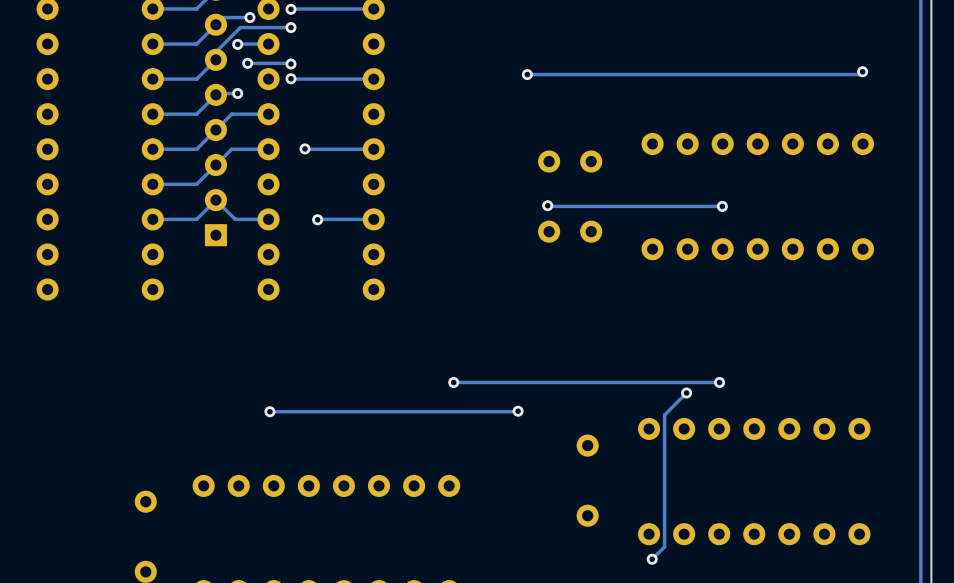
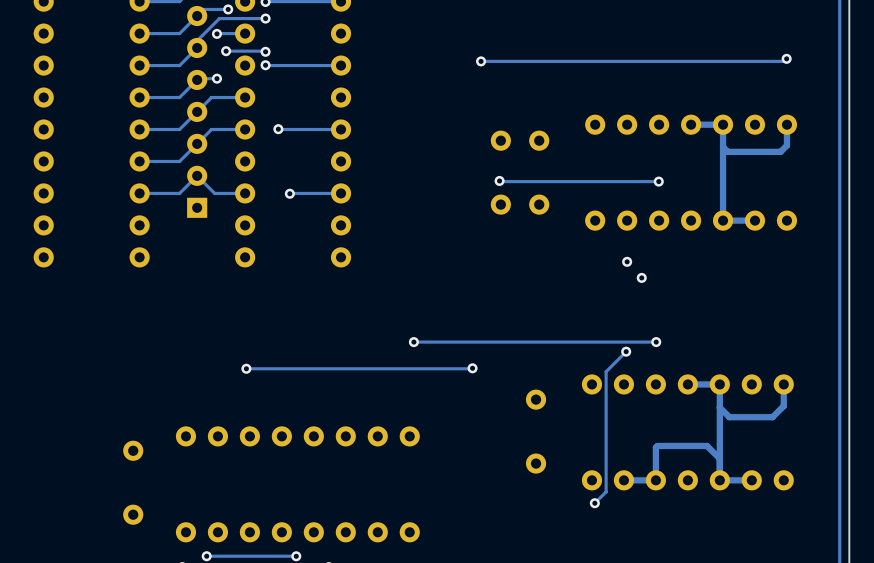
track: none -> (691, 124) (723, 124) (723, 220) (755, 220)
track: none -> (786, 124) (786, 145) (780, 151) (727, 151) (723, 147)
via: none -> (627, 261)
via: none -> (641, 277)
track: none -> (687, 384) (719, 384) (719, 480) (751, 480)
track: none -> (783, 384) (783, 406) (772, 417) (729, 417) (719, 407)
track: none -> (719, 458) (707, 445) (657, 445) (655, 447) (655, 480) (623, 480)

